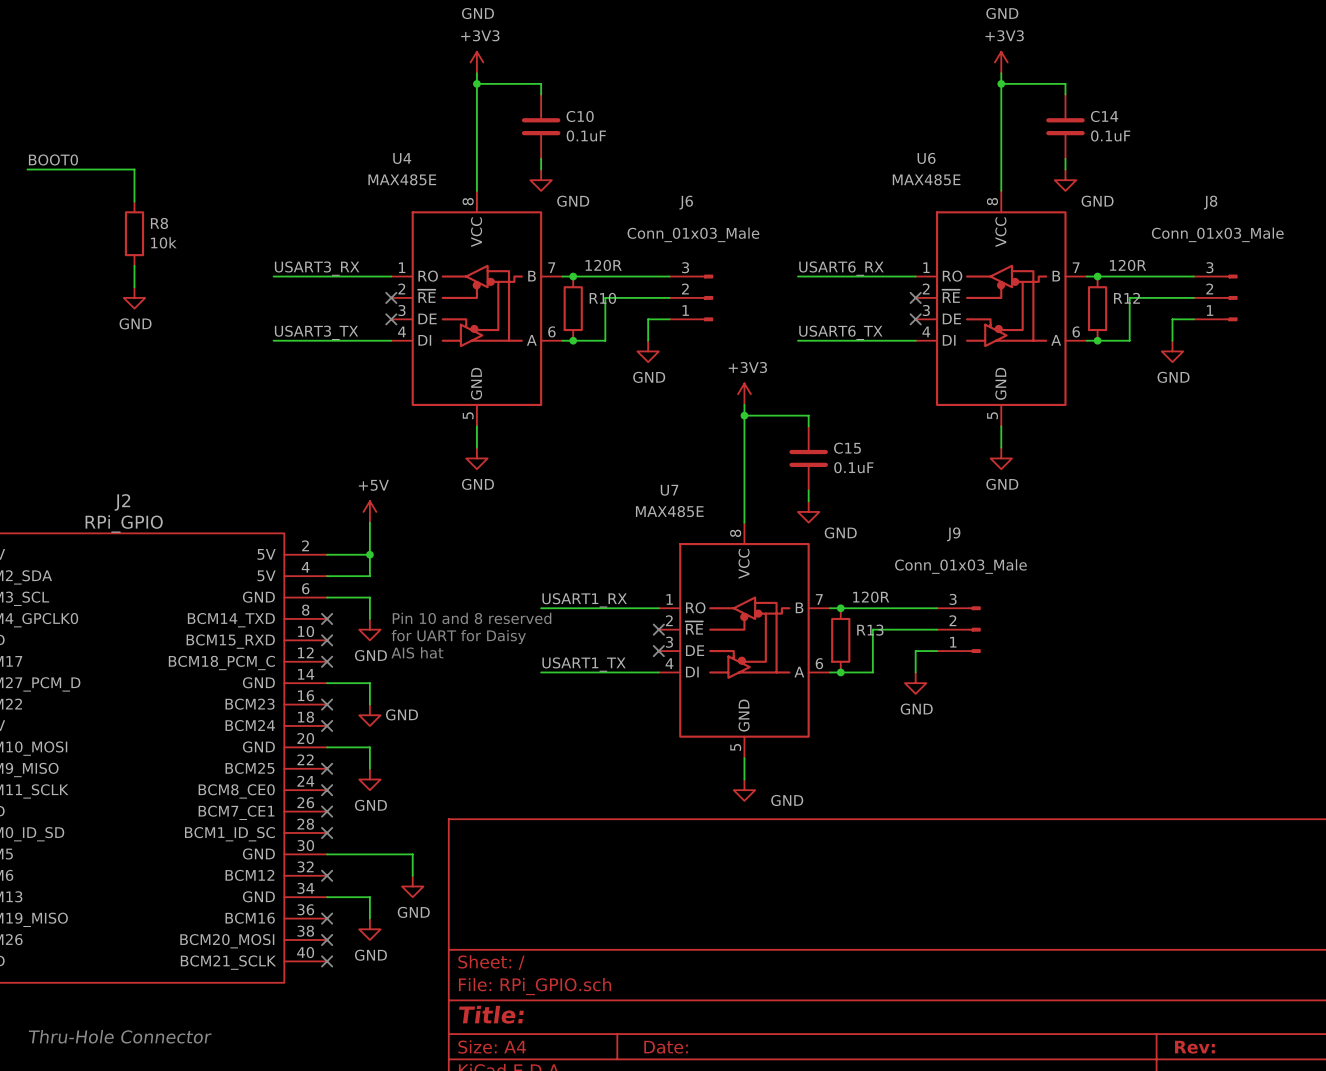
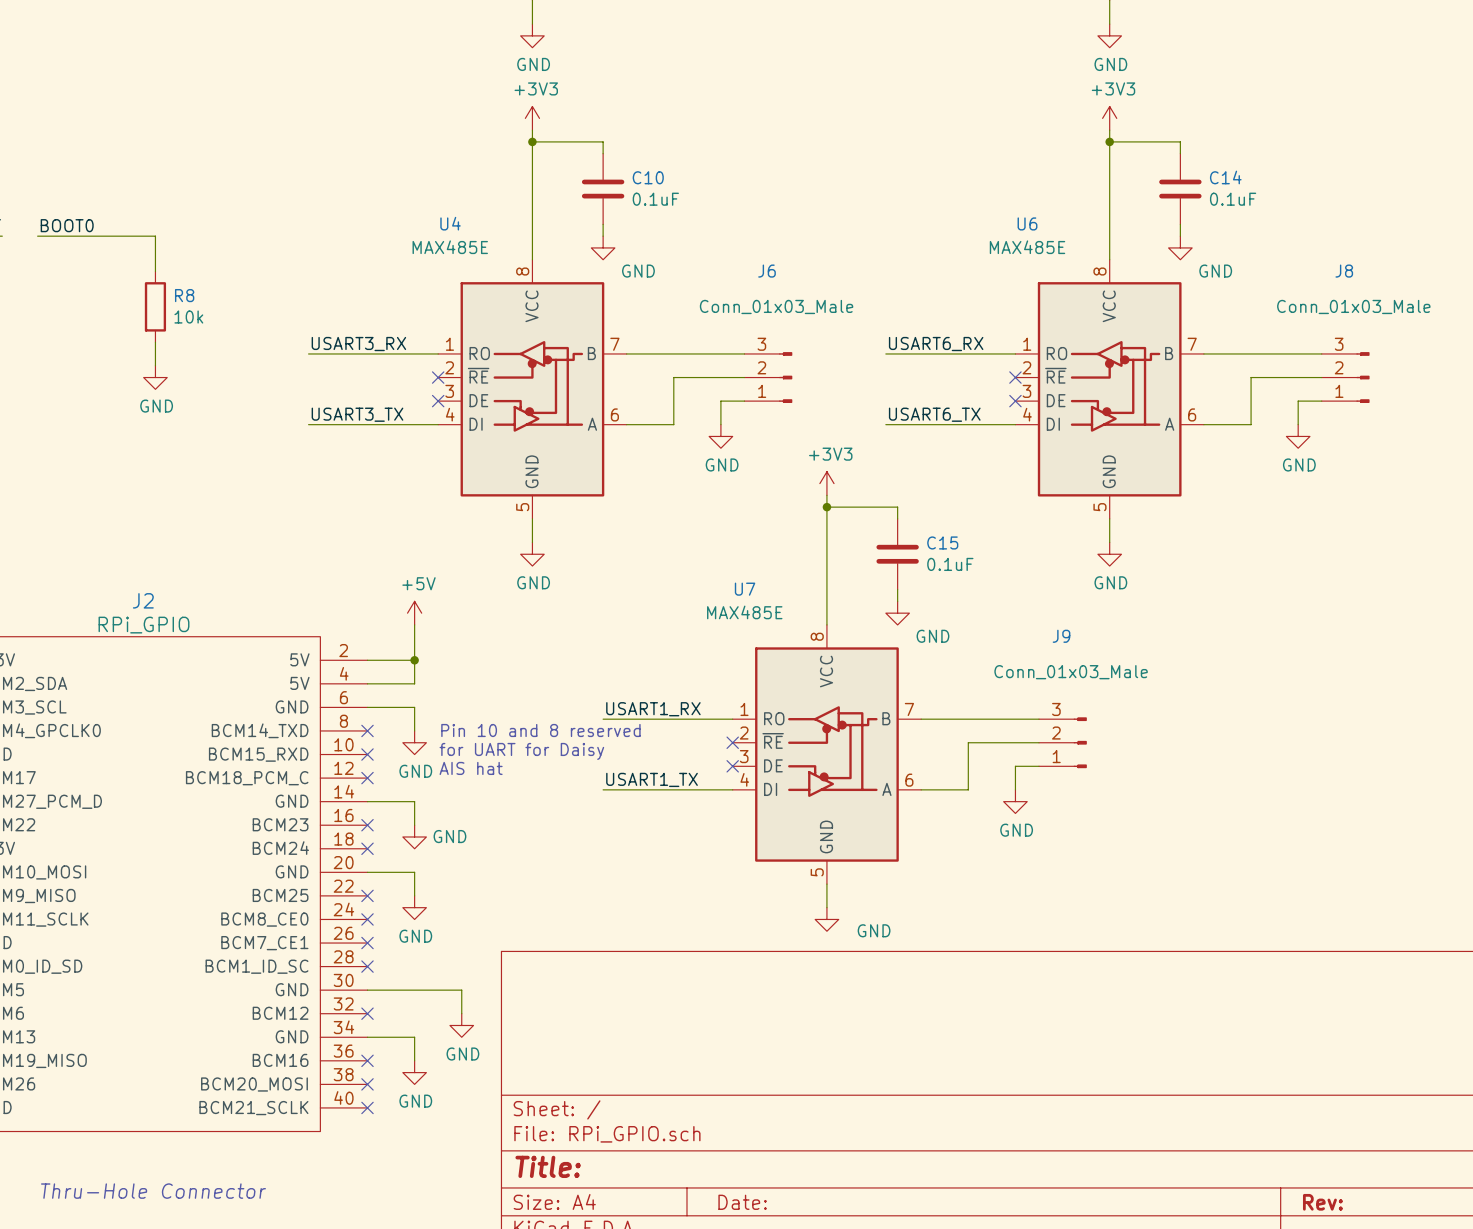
junction: (573, 276) -> none
junction: (1097, 276) -> none
R10: 120R (573, 308) -> none
R12: 120R (1097, 308) -> none
junction: (573, 340) -> none
junction: (1097, 340) -> none
junction: (840, 608) -> none
R13: 120R (840, 640) -> none
junction: (840, 672) -> none

